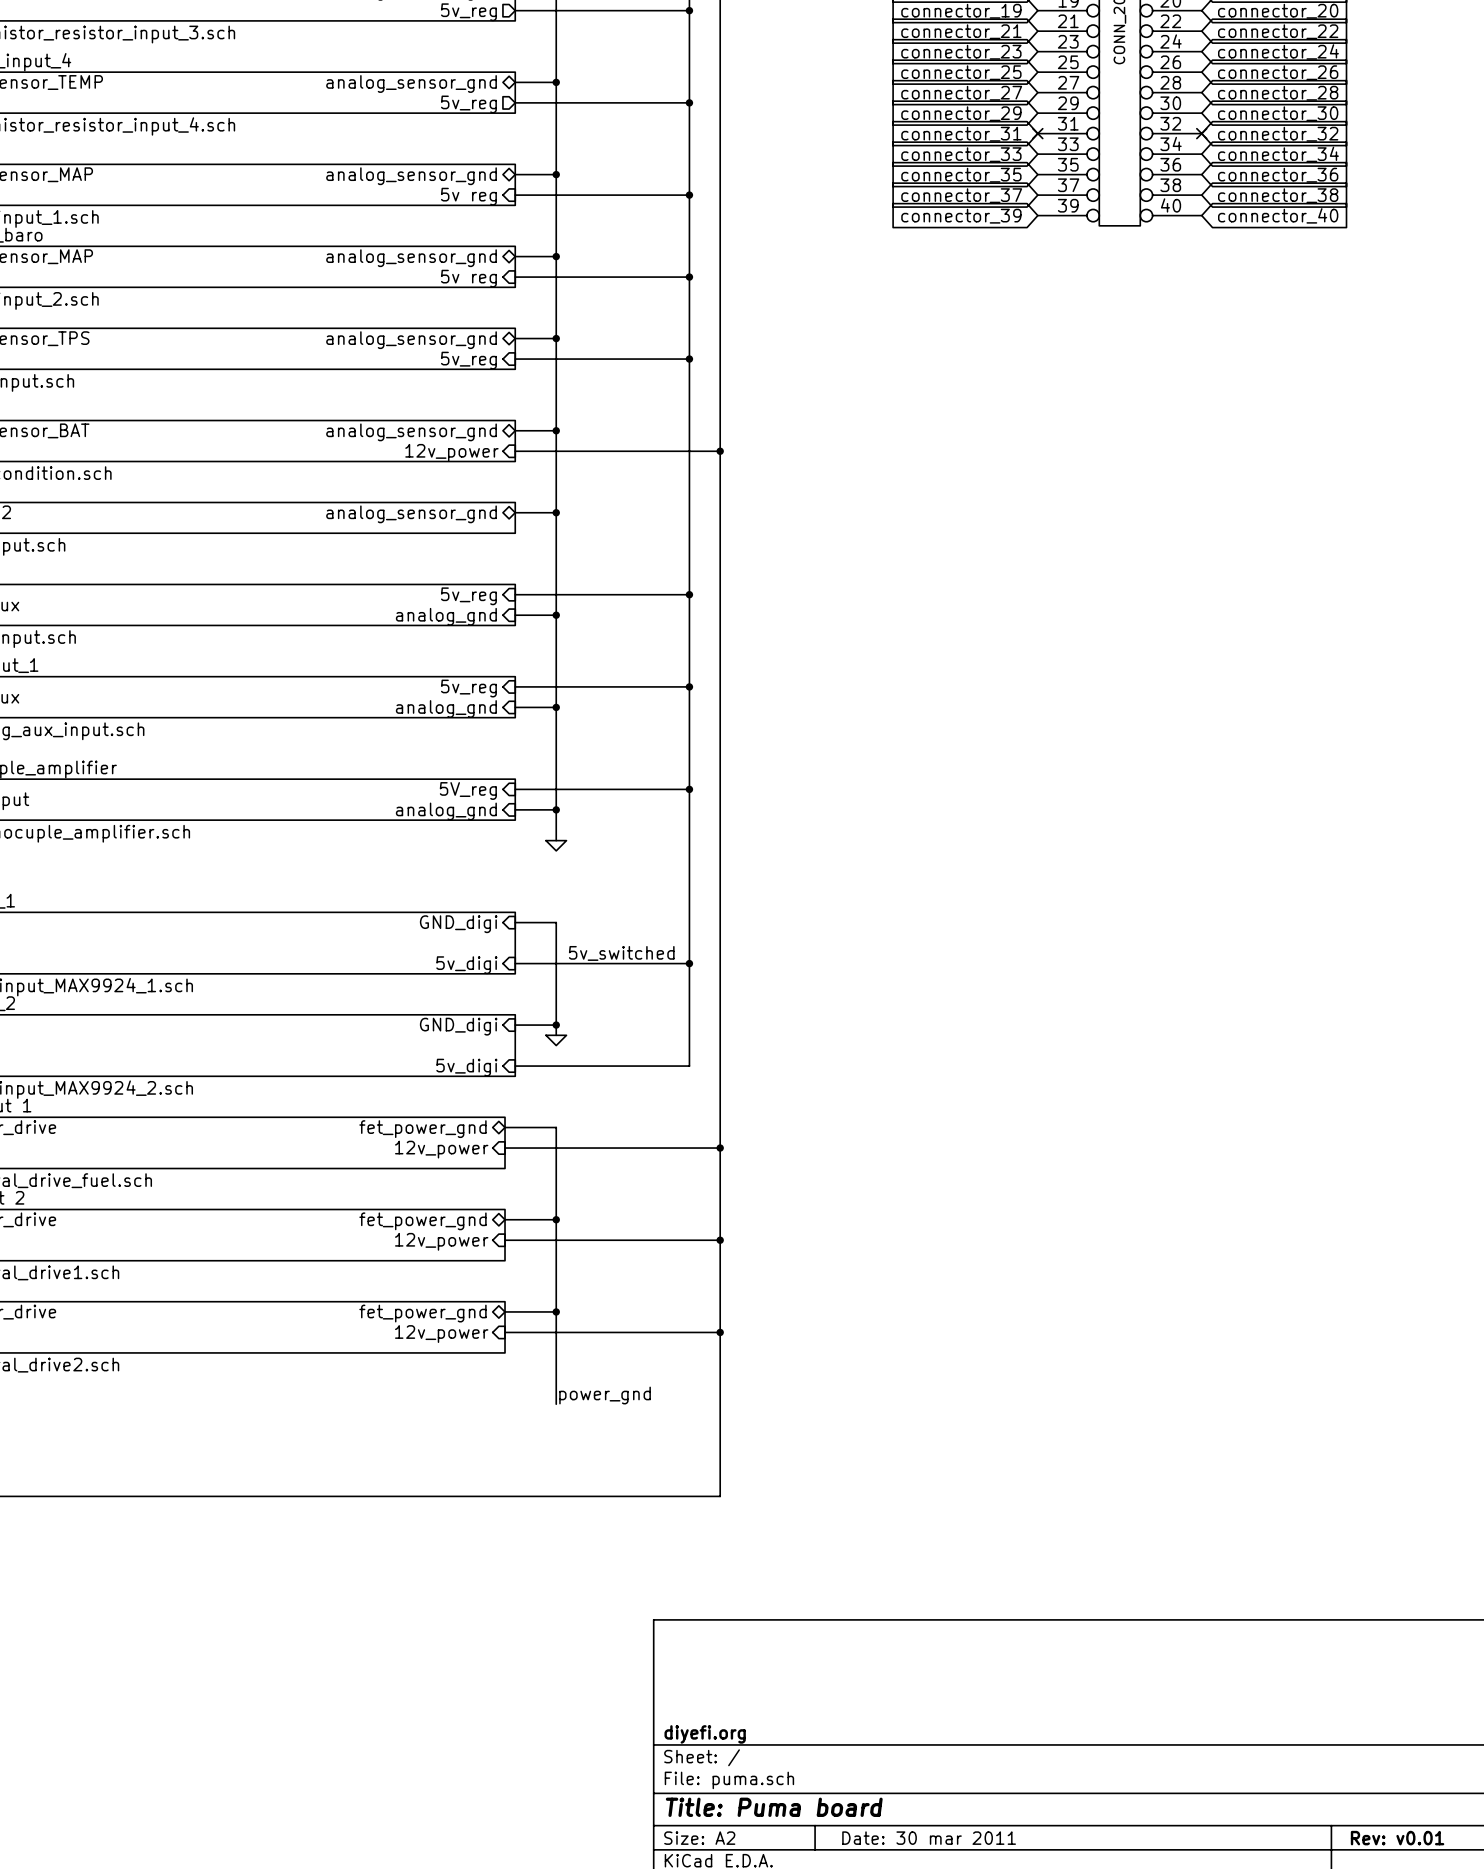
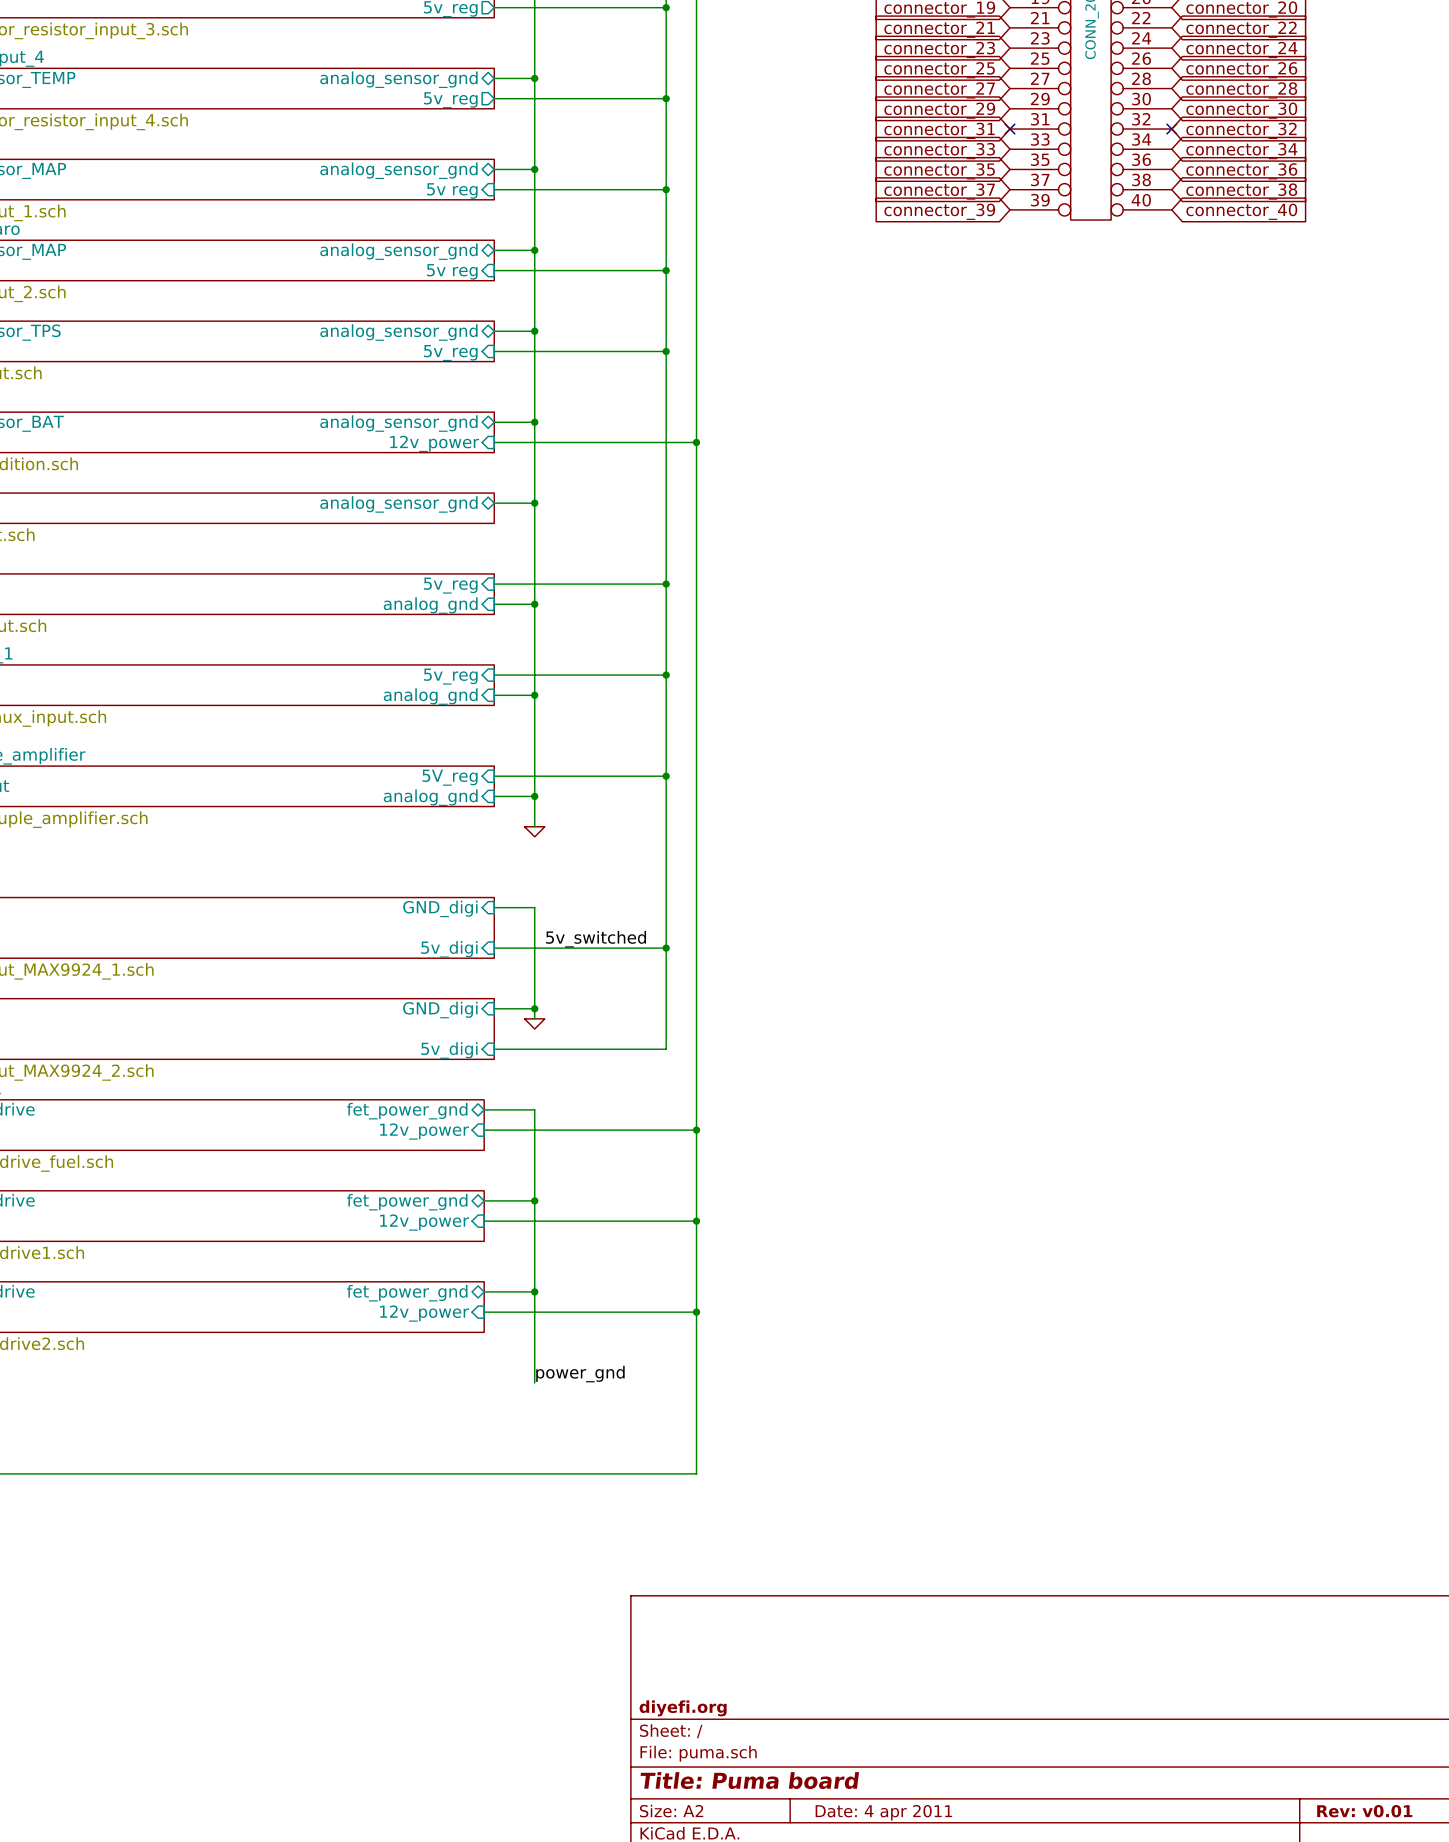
title block: Date: 30 mar 2011 (929, 1838) -> Date: 4 apr 2011 (883, 1812)

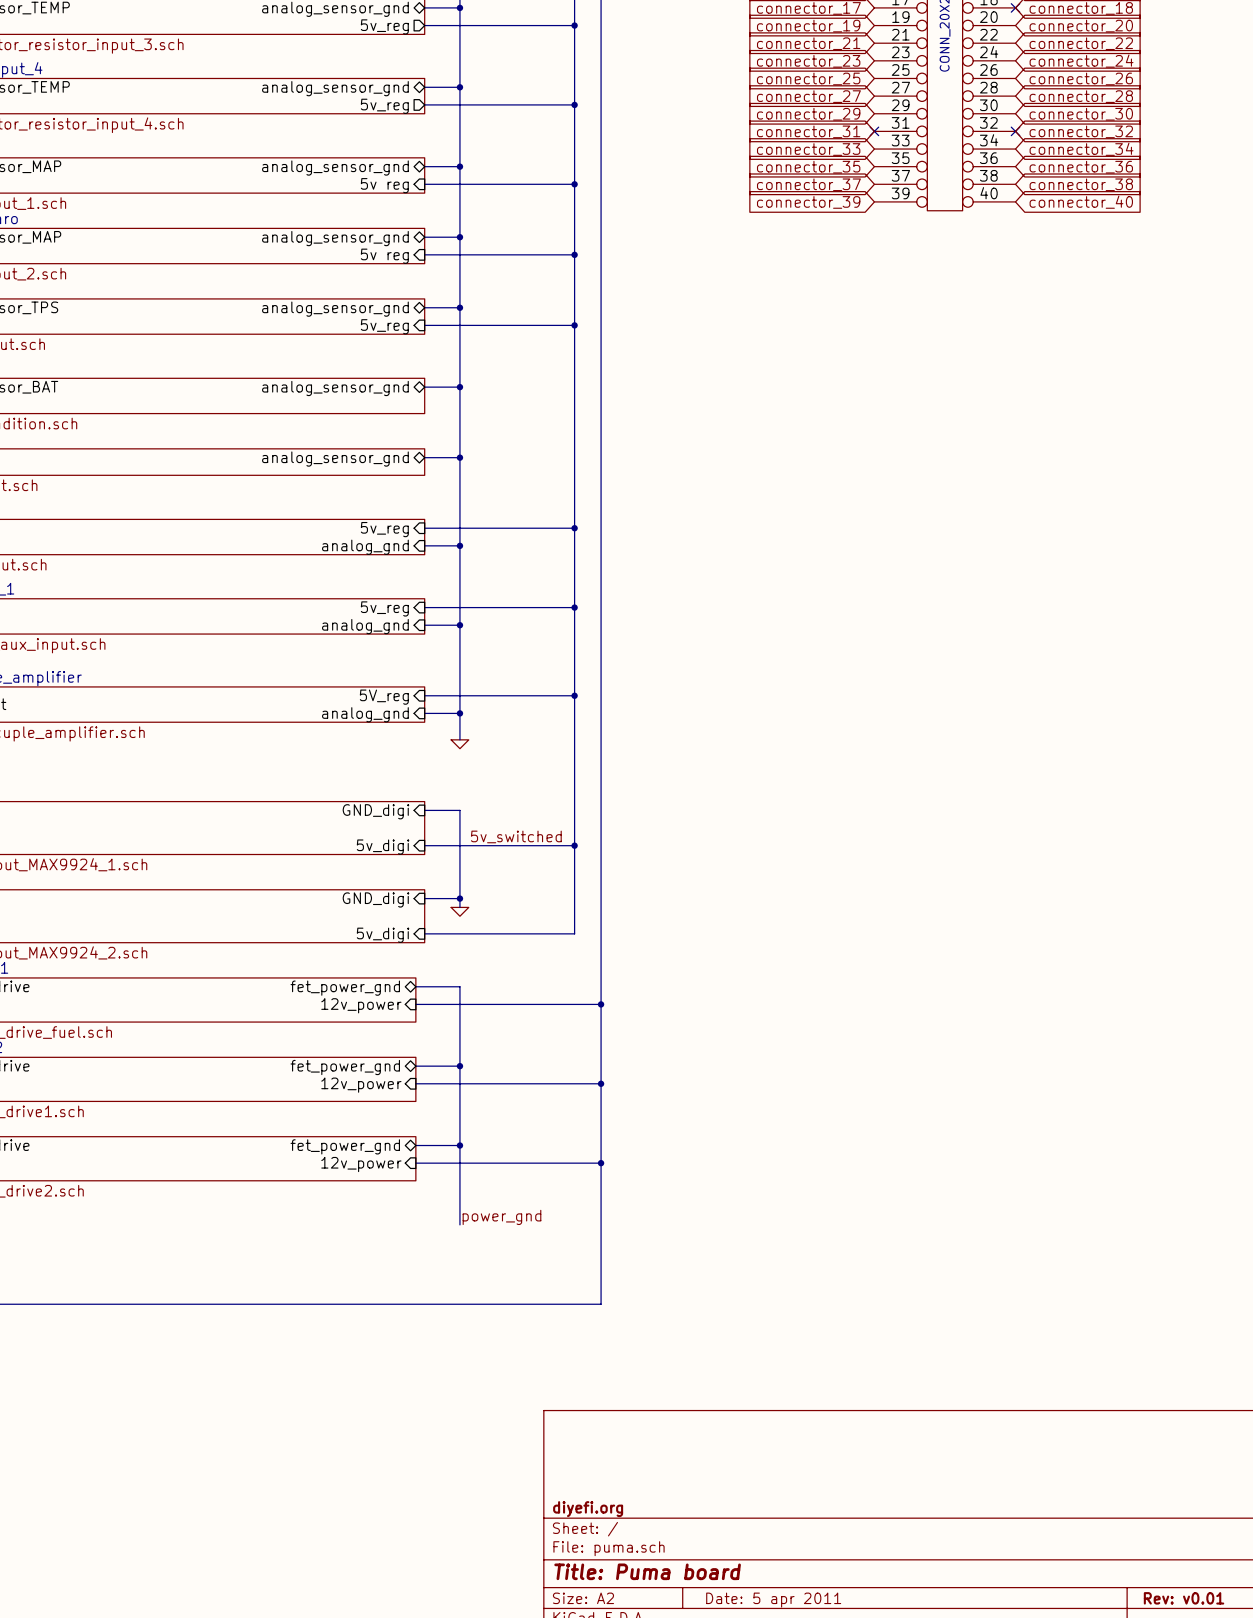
wire: (494, 442) (696, 442) -> none
junction: (696, 442) -> none
sheet pin: 12v_power (434, 443) -> none
title block: Date: 4 apr 2011 (883, 1812) -> Date: 5 apr 2011 (773, 1600)

